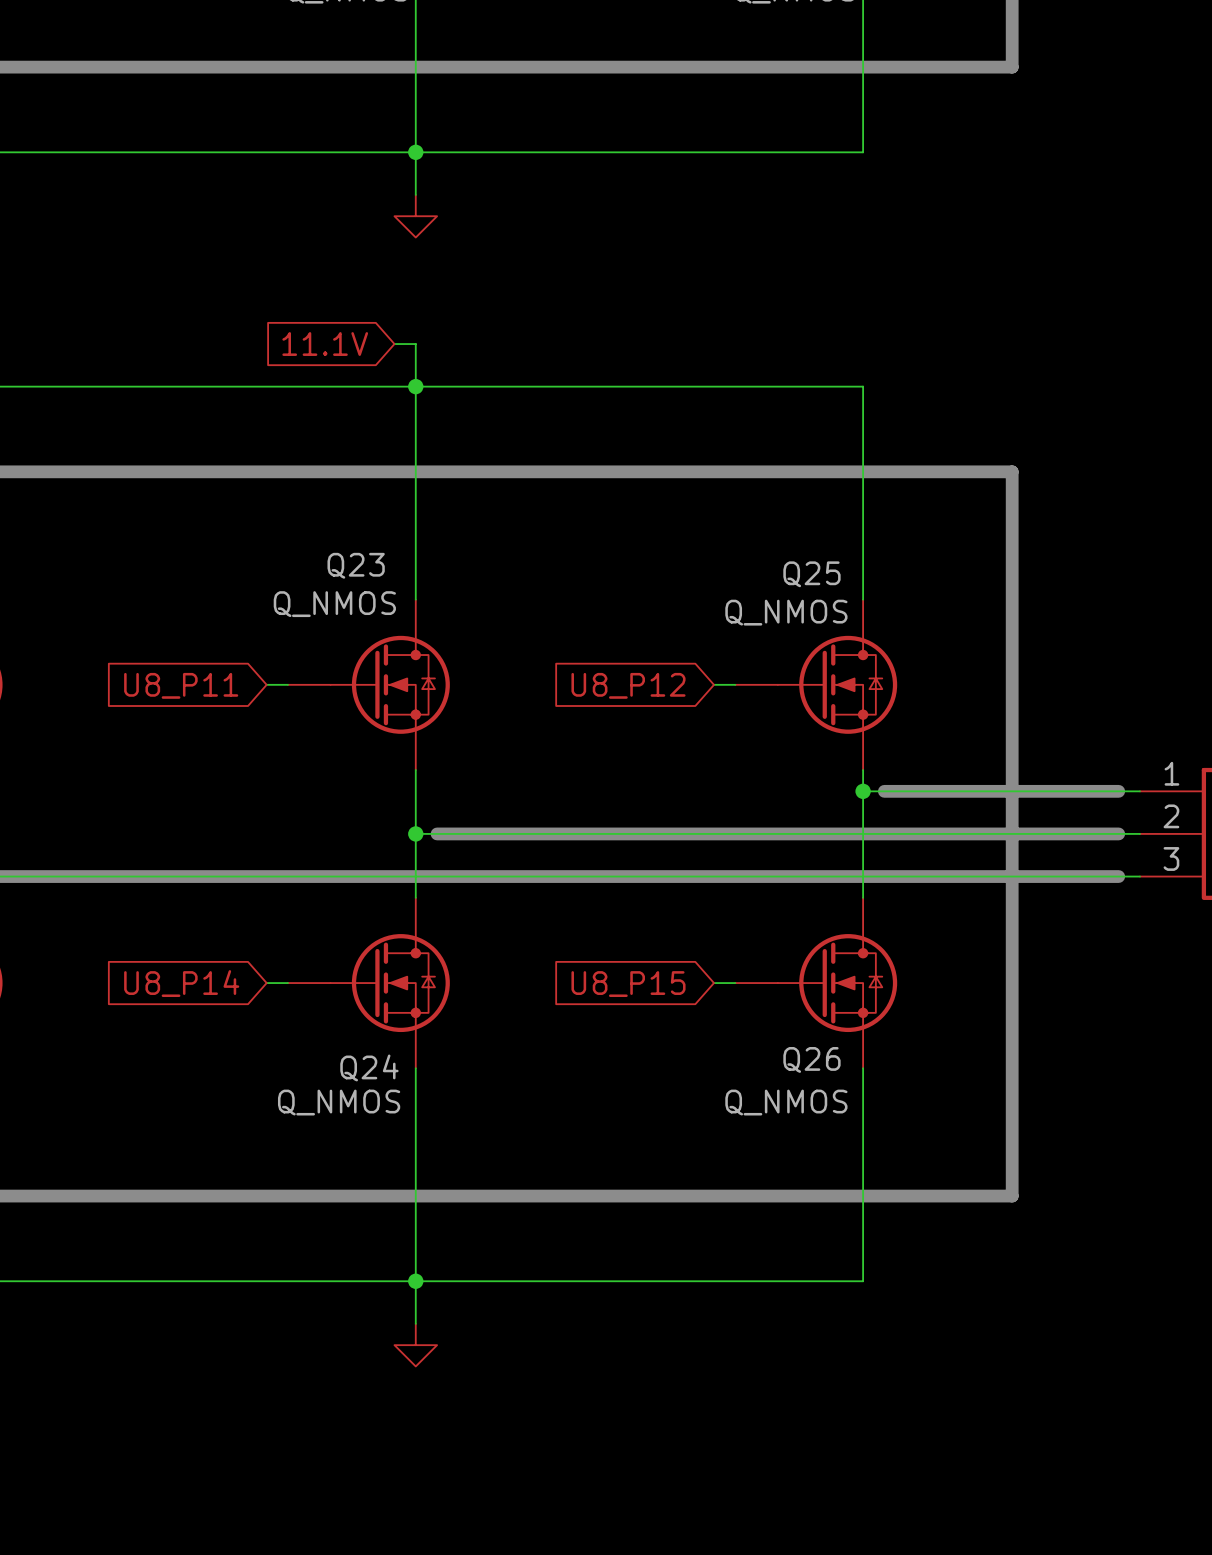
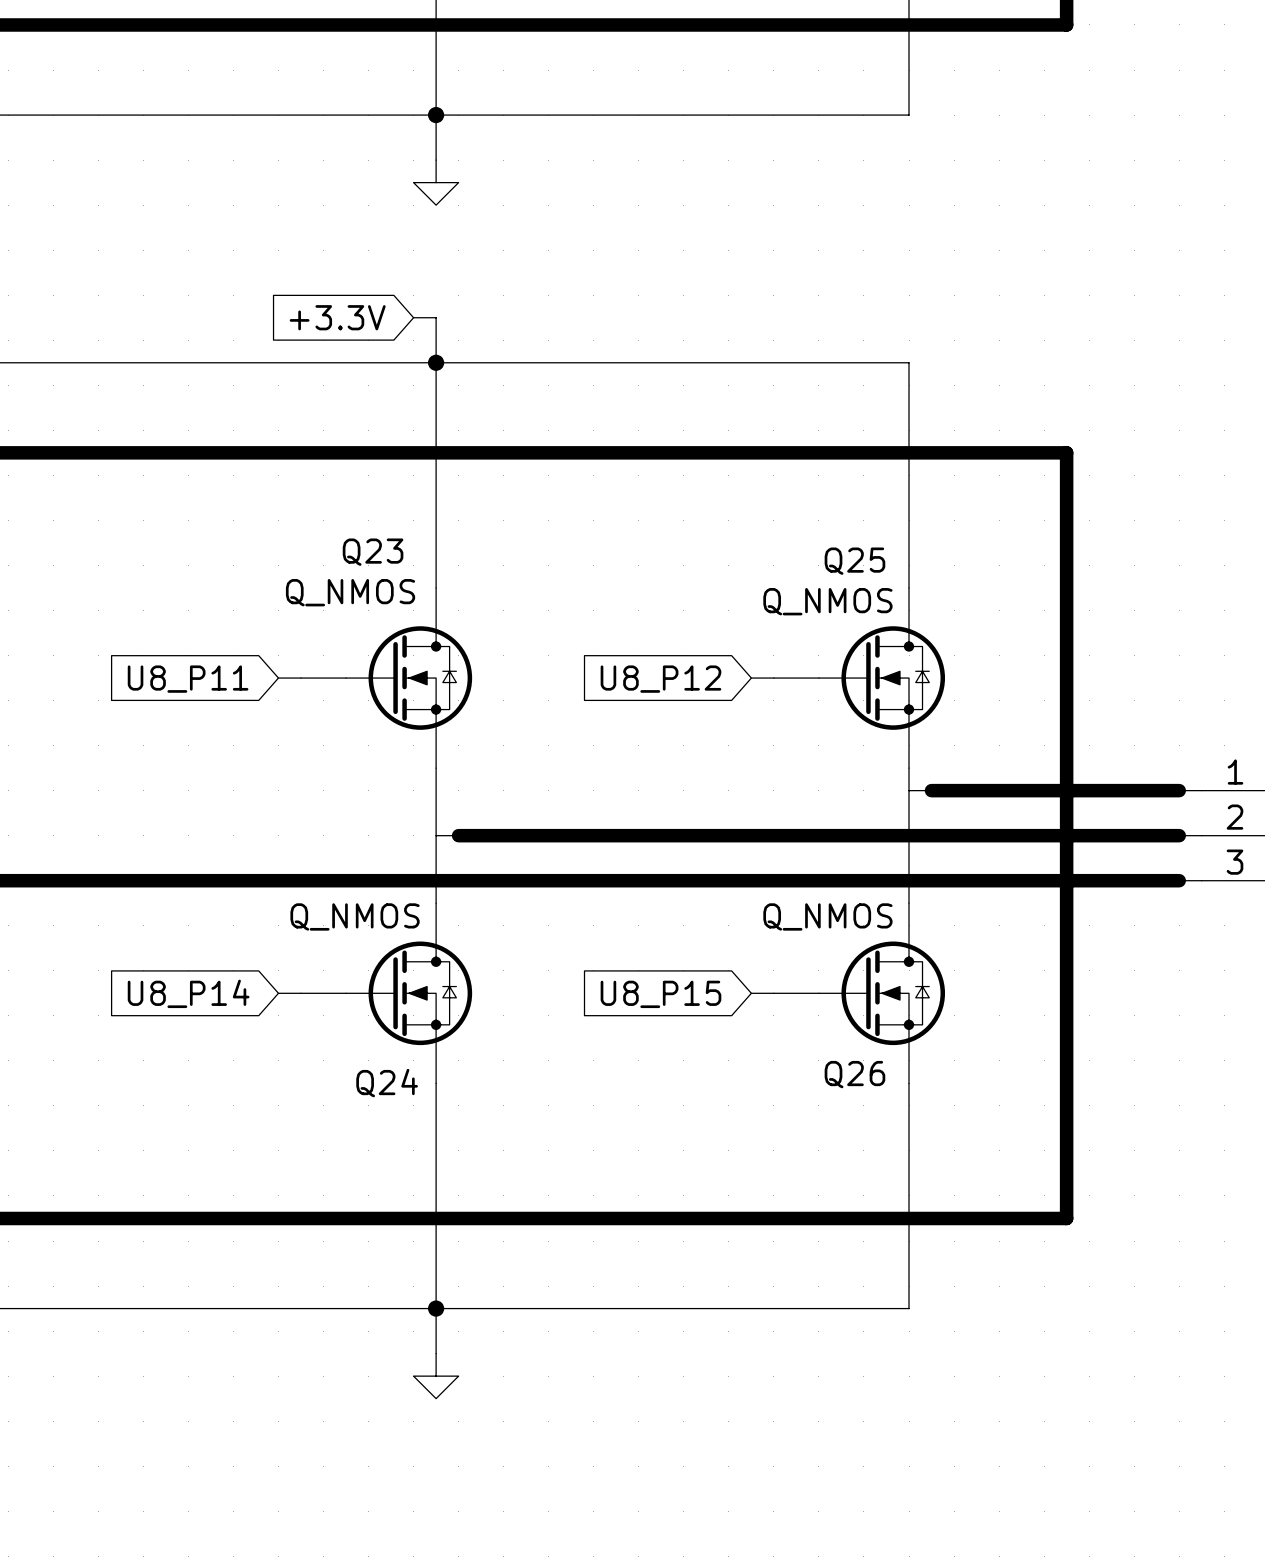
global label: 11.1V (325, 344) -> +3.3V (337, 317)
junction: (863, 791) -> none
junction: (415, 833) -> none
Q24 value position: Q_NMOS (339, 1102) -> Q_NMOS (355, 916)
Q26 value position: Q_NMOS (786, 1102) -> Q_NMOS (827, 916)

